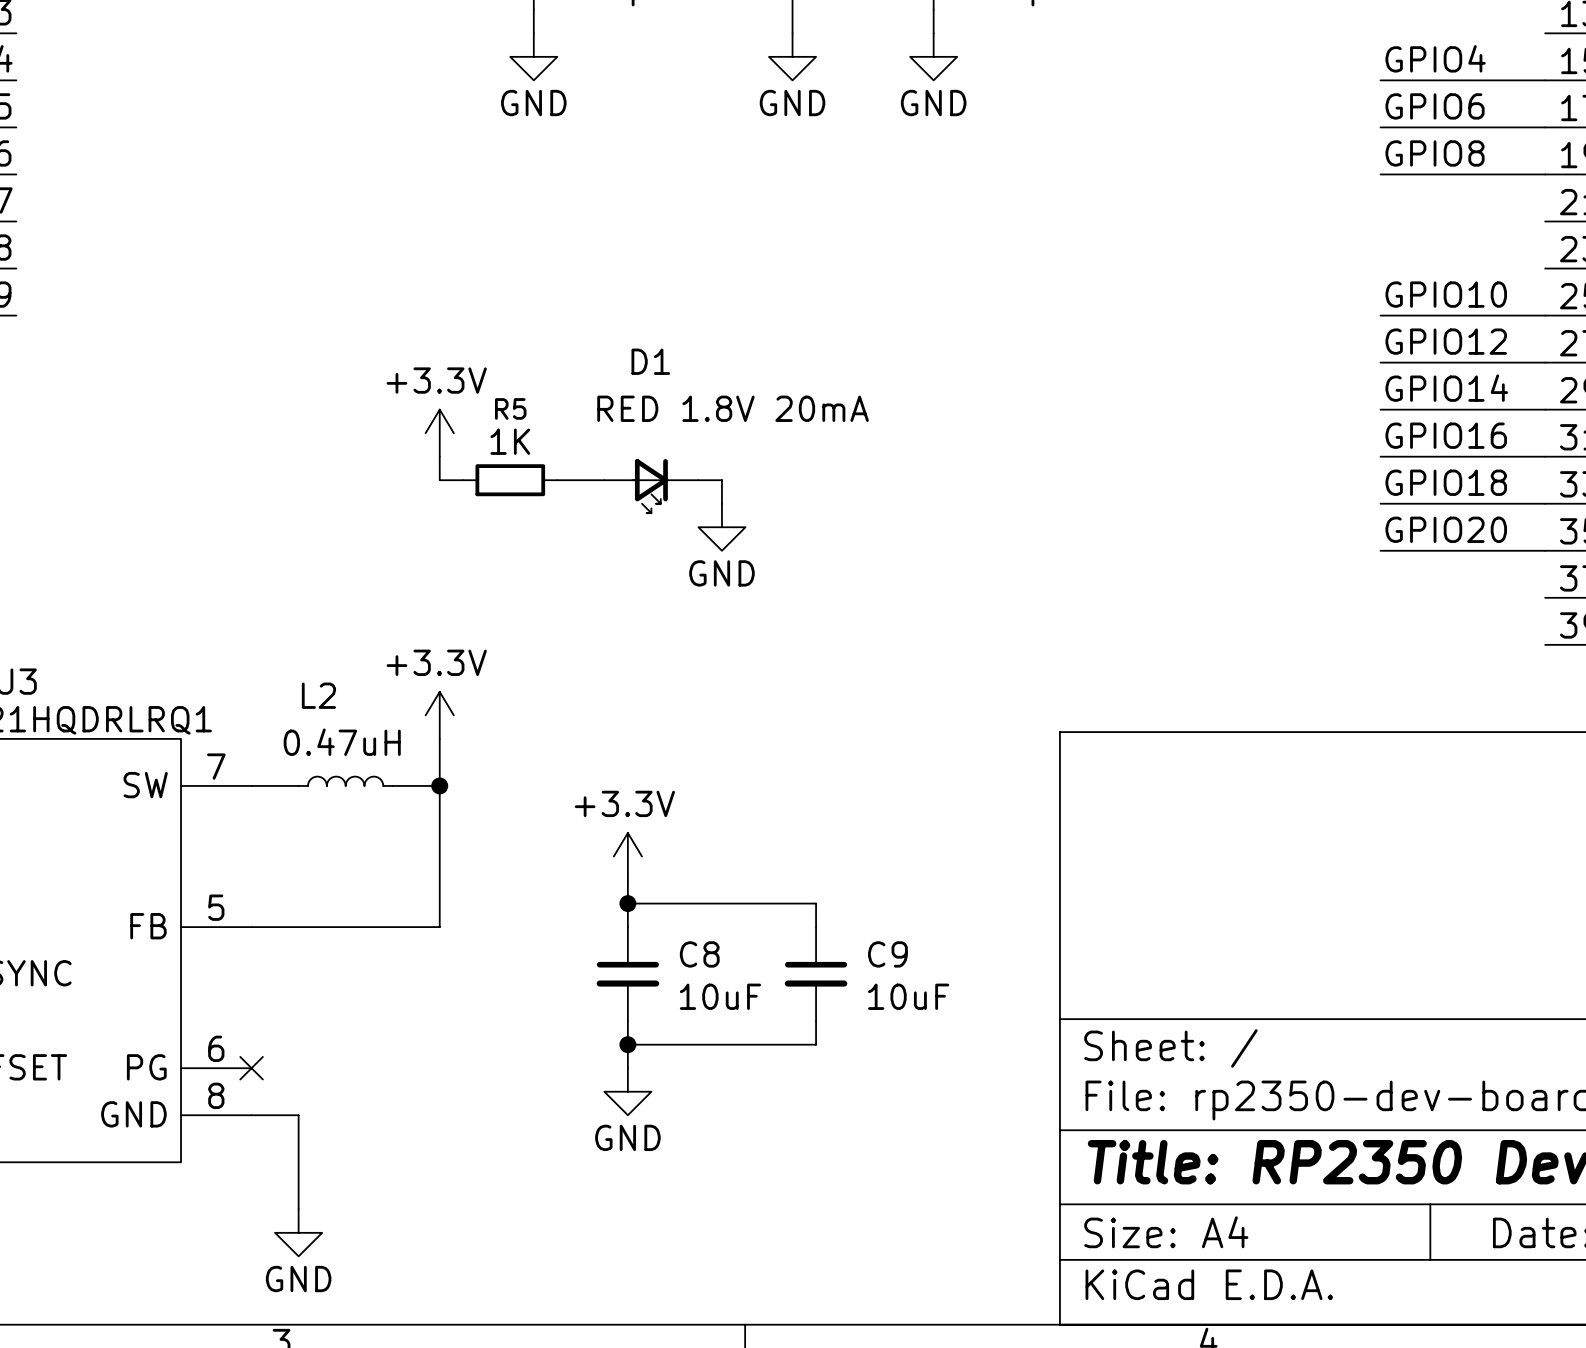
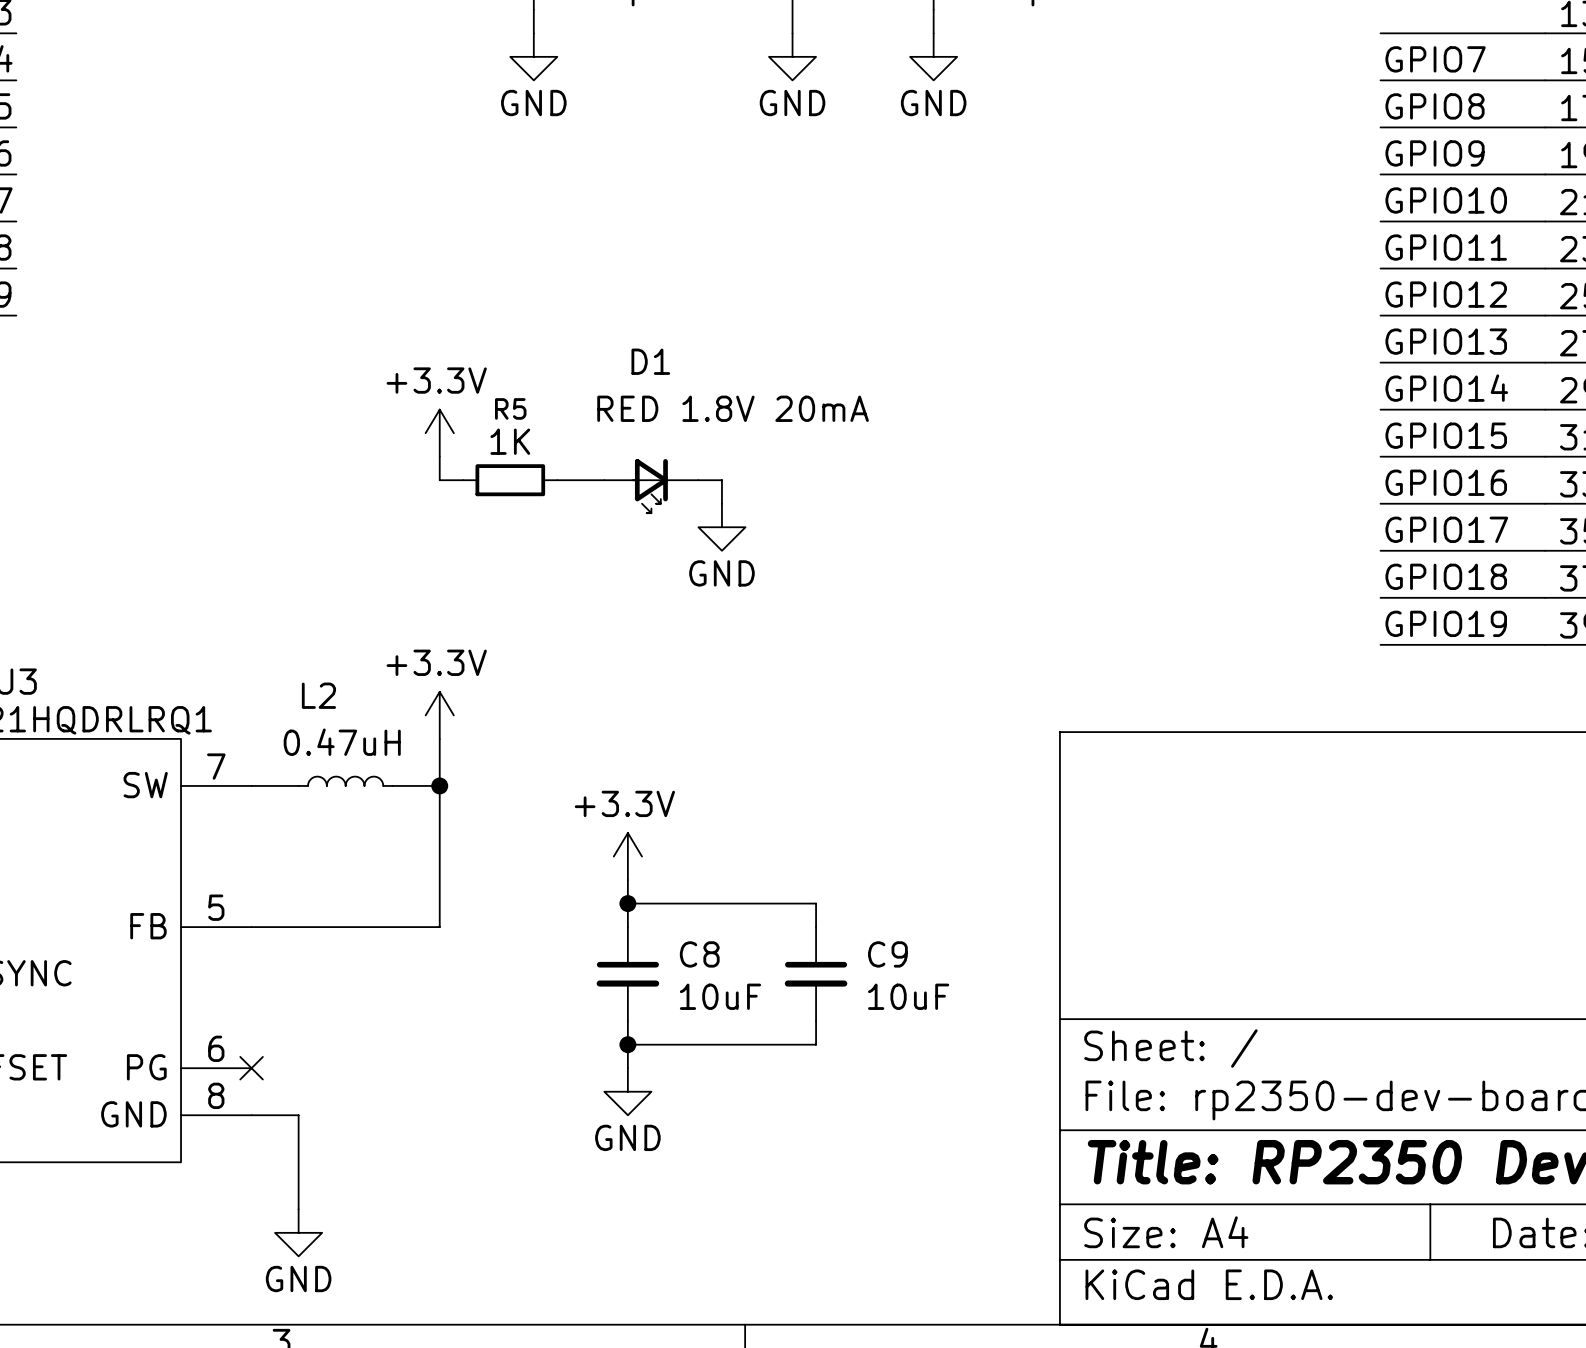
wire: none -> (1380, 33) (1545, 33)
label: GPIO4 (1435, 58) -> GPIO7 (1435, 59)
label: GPIO6 (1435, 106) -> GPIO8 (1435, 106)
label: GPIO8 (1435, 153) -> GPIO9 (1435, 153)
label: none -> GPIO10 (1446, 200)
wire: none -> (1380, 221) (1545, 221)
label: none -> GPIO11 (1446, 247)
wire: none -> (1380, 268) (1545, 268)
label: GPIO10 (1446, 294) -> GPIO12 (1446, 294)
label: GPIO12 (1446, 341) -> GPIO13 (1446, 341)
label: GPIO16 (1446, 435) -> GPIO15 (1446, 435)
label: GPIO18 (1446, 482) -> GPIO16 (1446, 482)
label: GPIO20 (1446, 529) -> GPIO17 (1446, 529)
label: none -> GPIO18 (1446, 576)
wire: none -> (1380, 597) (1545, 597)
label: none -> GPIO19 (1446, 623)
wire: none -> (1380, 644) (1545, 644)

